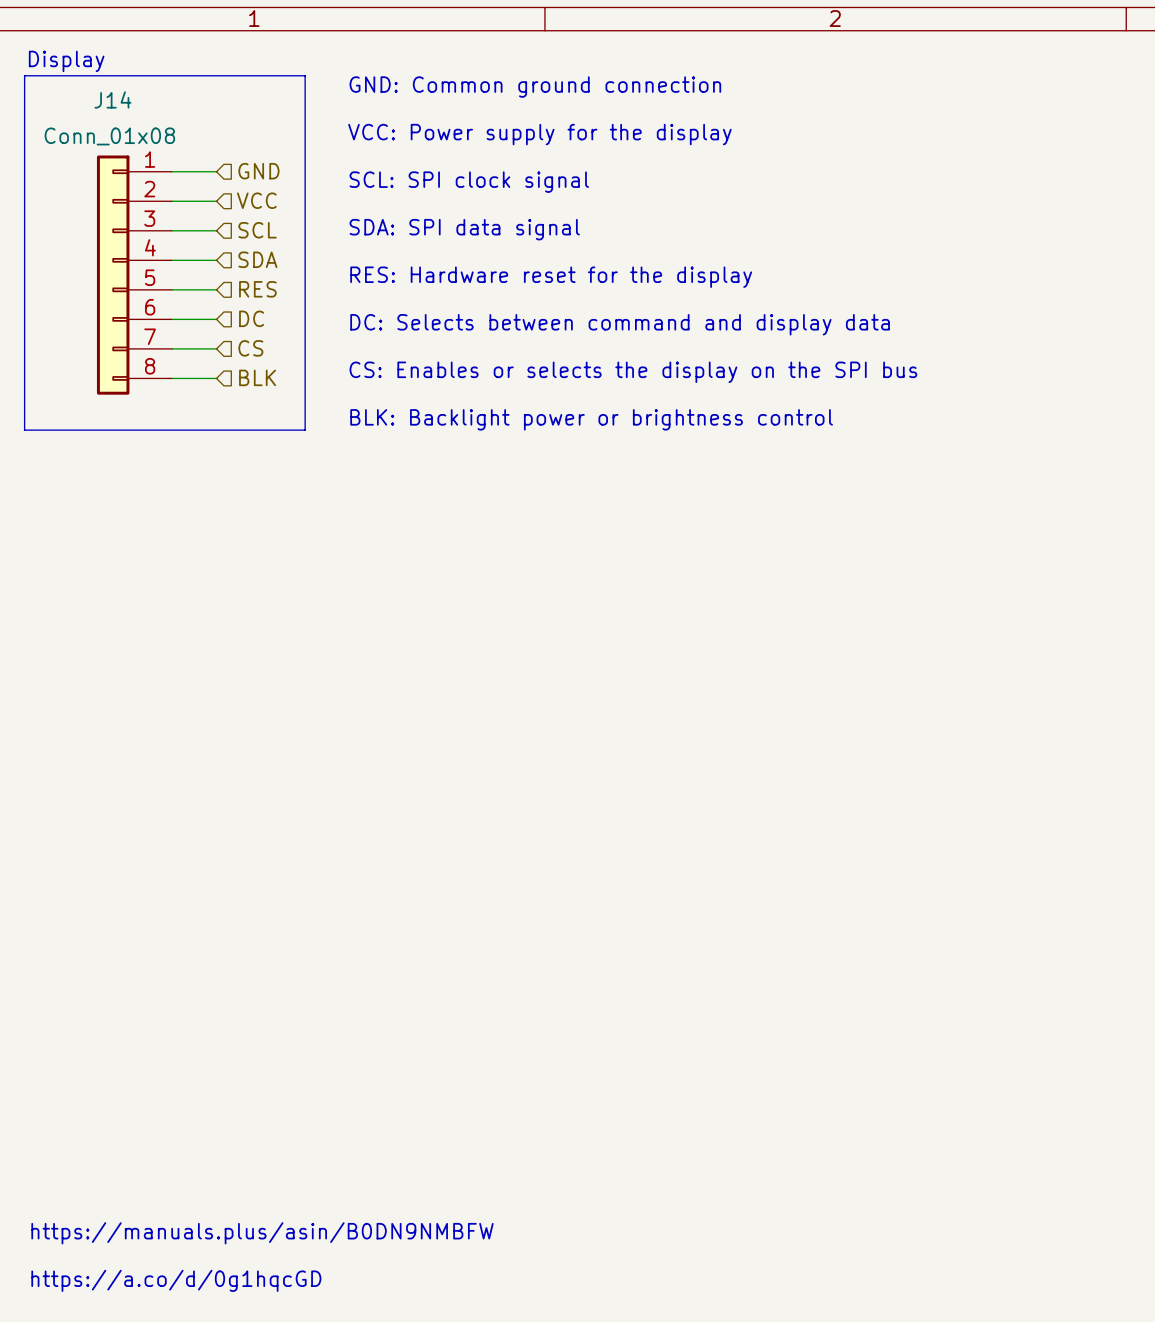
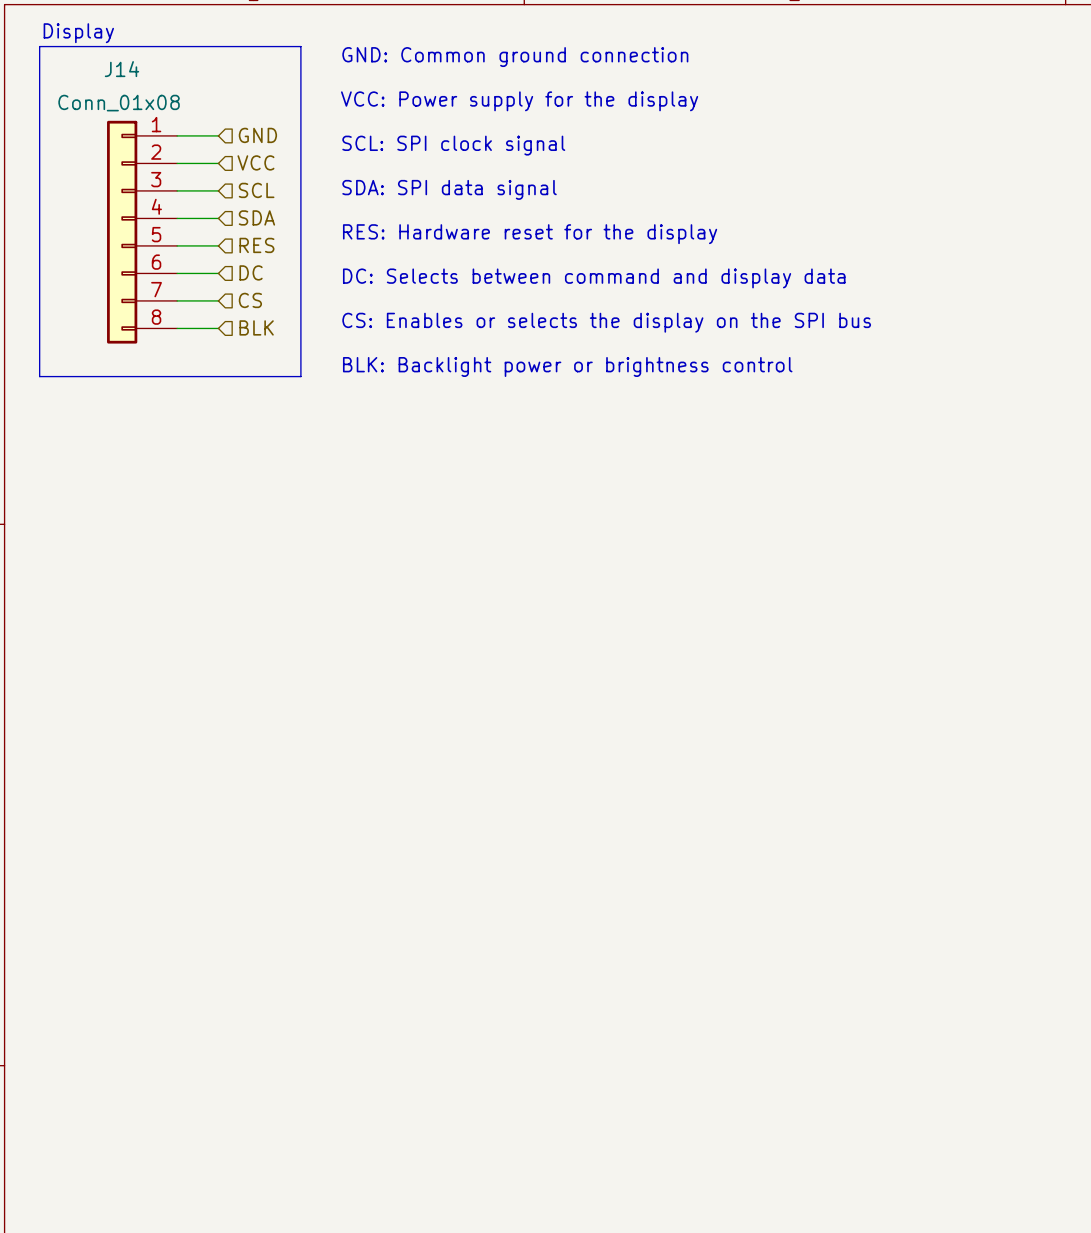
text: https://manuals.plus/asin/B0DN9NMBFW (262, 1233) -> none
text: https://a.co/d/0g1hqcGD (176, 1280) -> none

